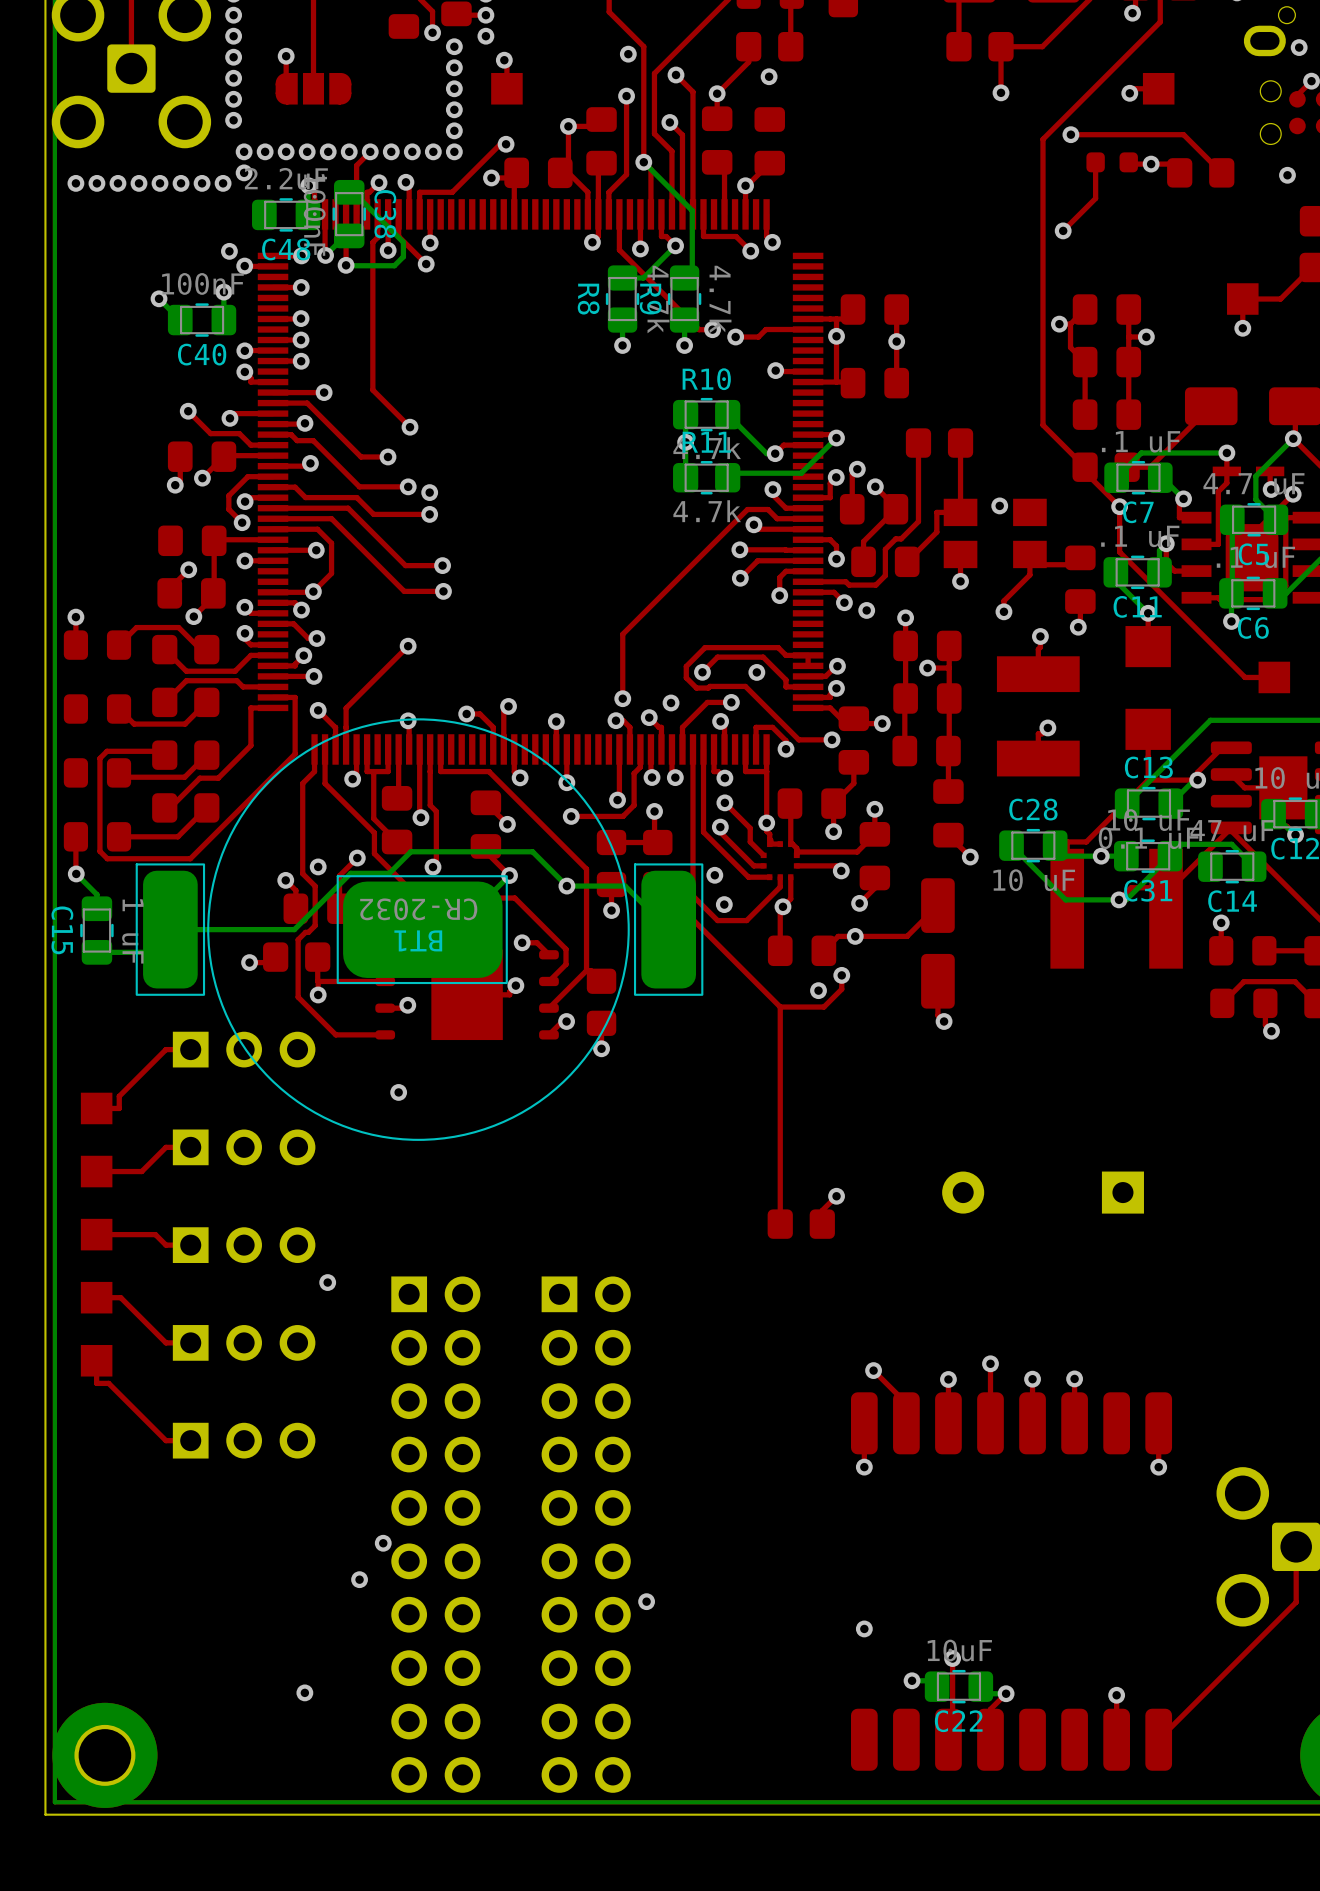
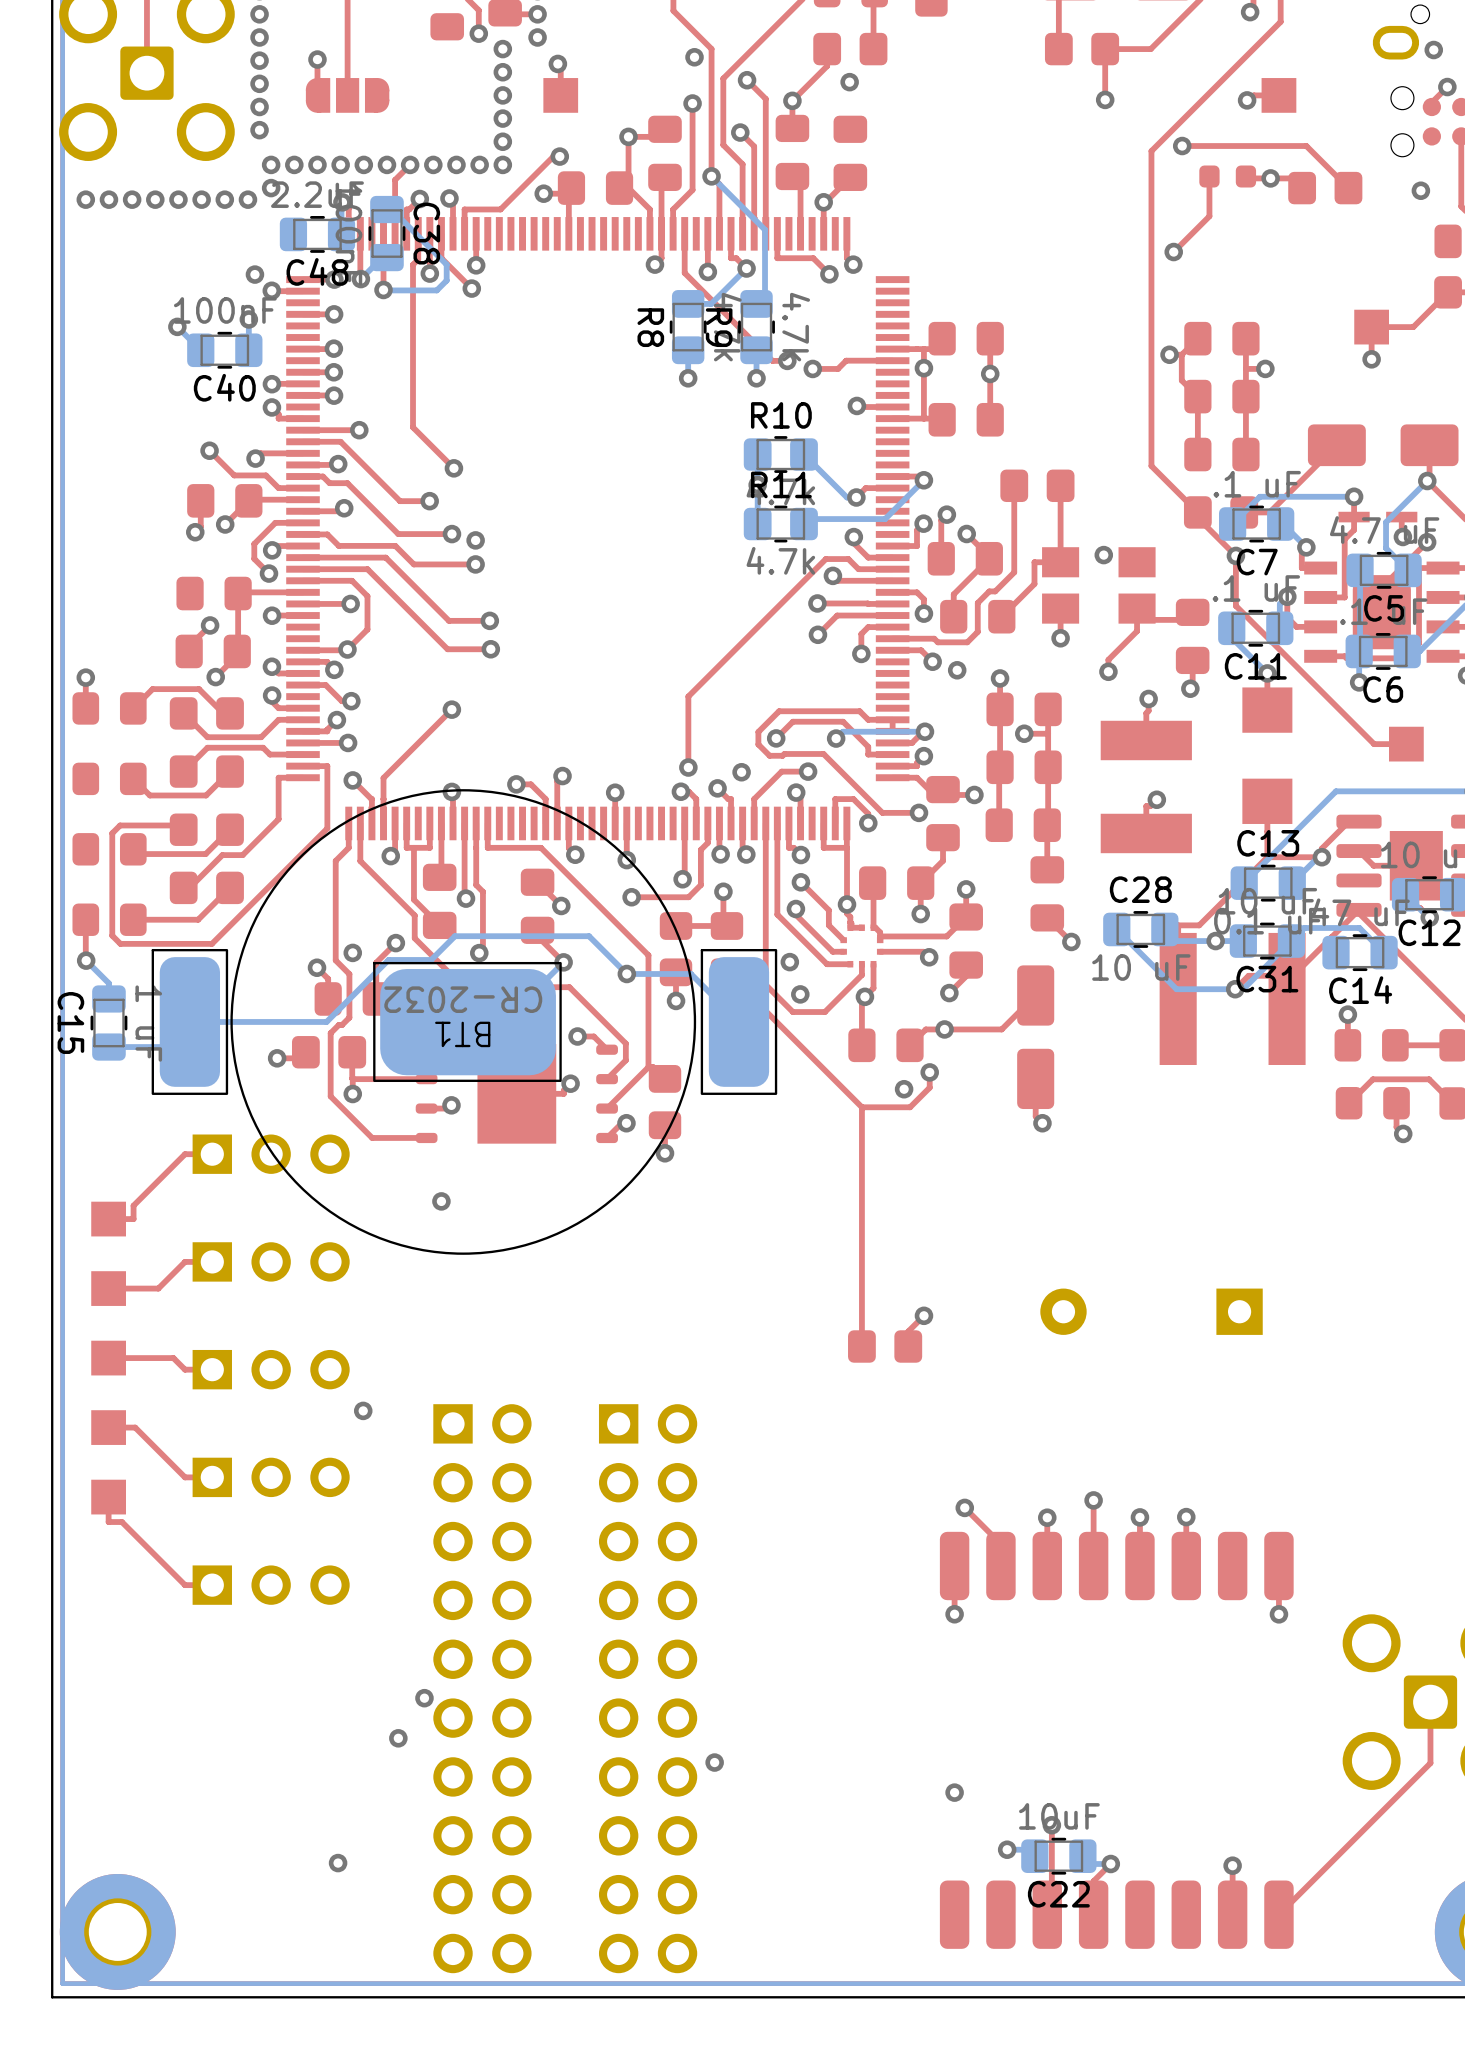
bottom track: none -> (924, 731) (842, 731) (836, 738)

